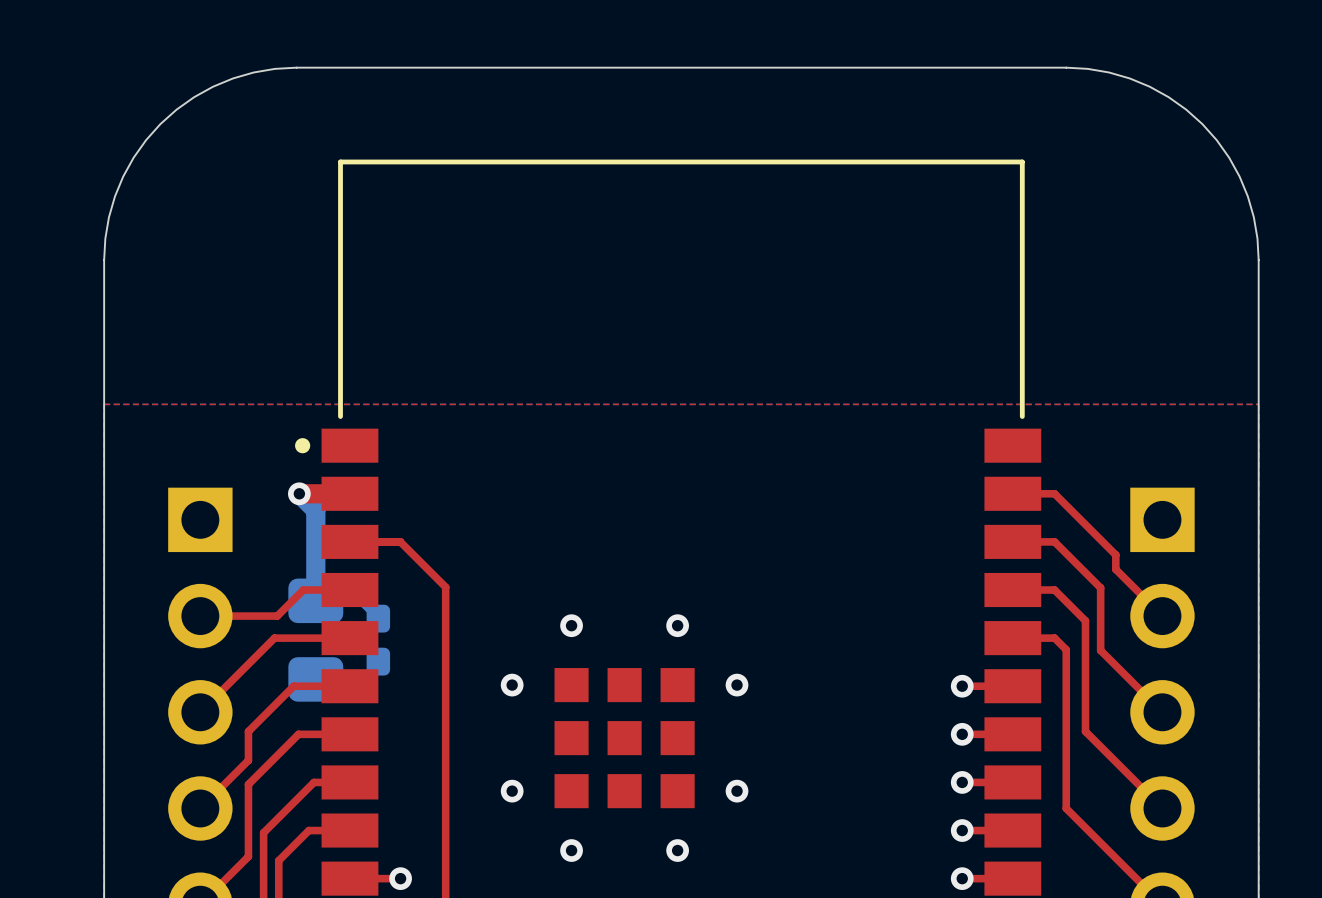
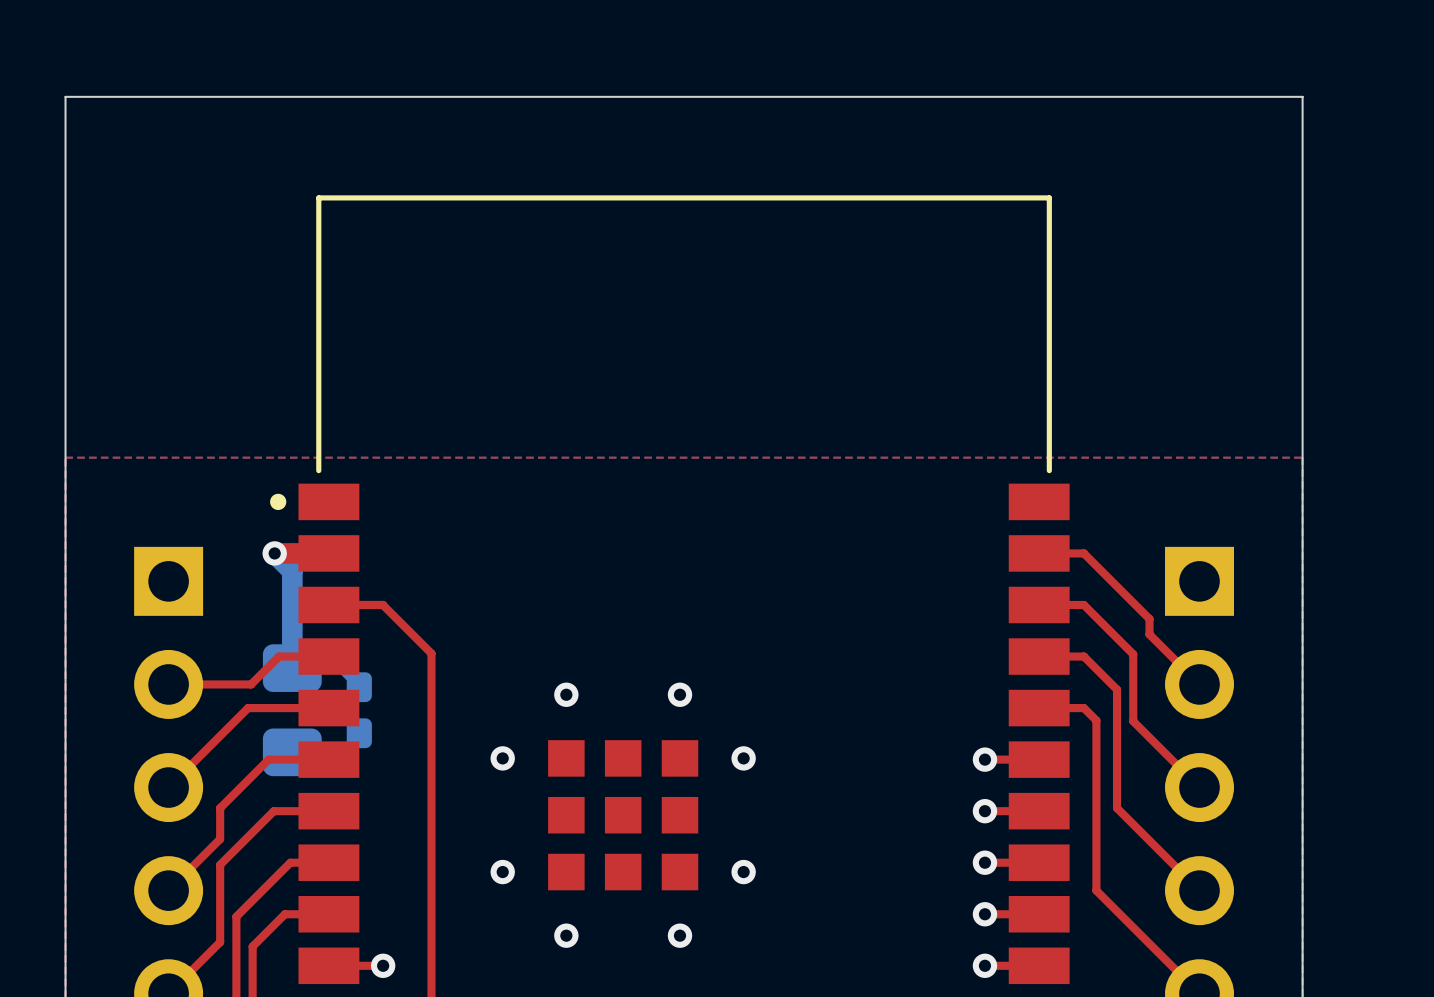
board edge: (296, 67) (275, 68) (233, 78) (194, 97) (160, 124) (133, 157) (114, 196) (105, 238) (104, 260) -> (271, 96) (65, 96) (65, 303)
board edge: (1066, 67) (1087, 68) (1129, 78) (1168, 97) (1202, 124) (1229, 157) (1247, 196) (1257, 238) (1258, 260) -> (1096, 96) (1302, 96) (1302, 303)

